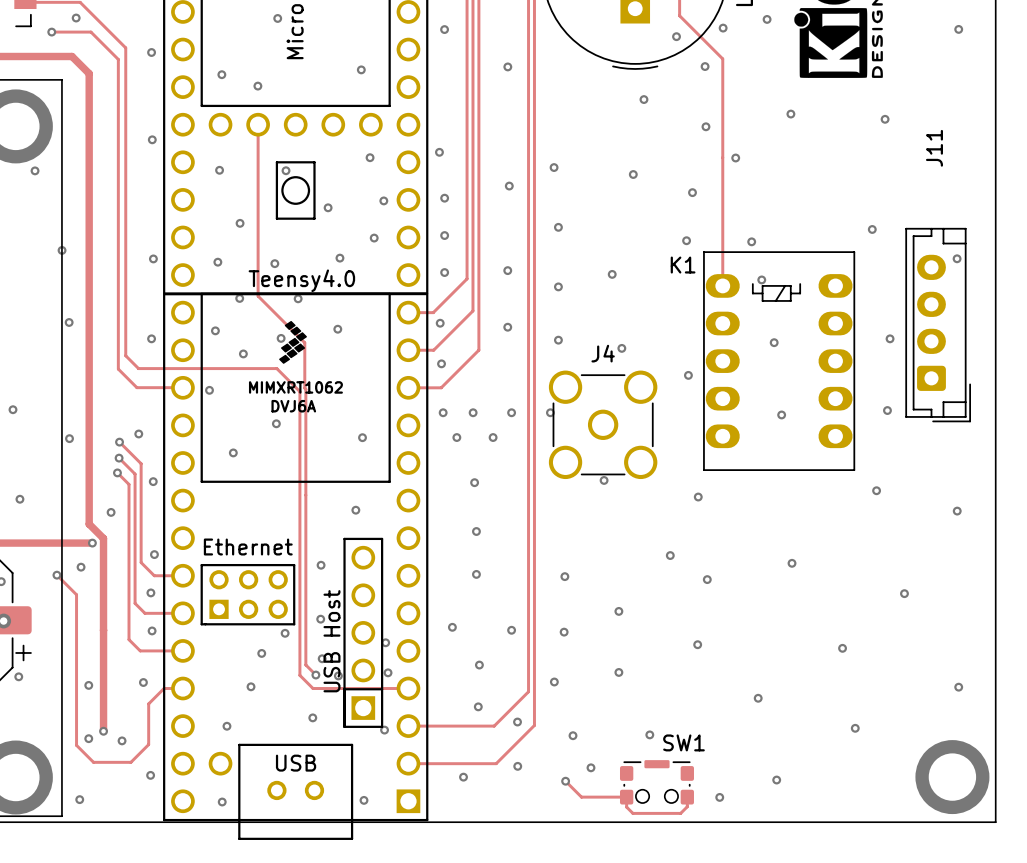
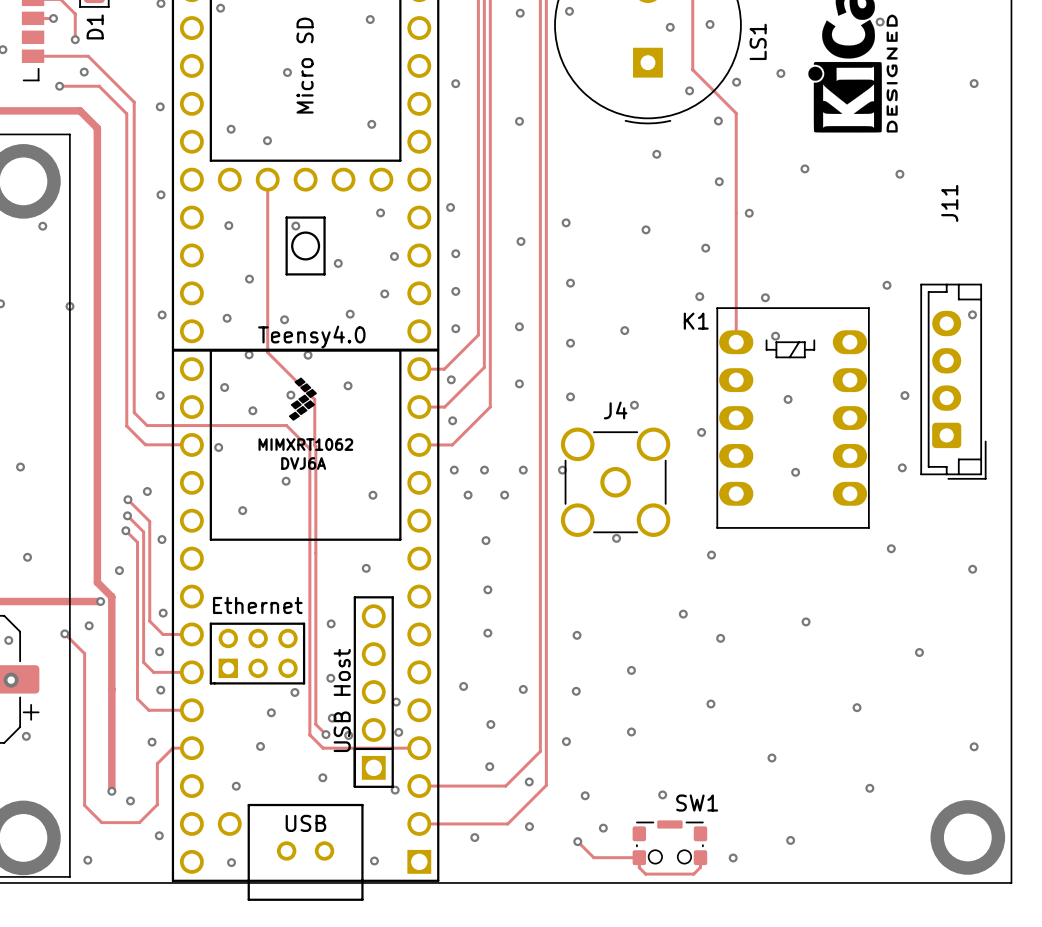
via: (69, 322) -> none
via: (69, 438) -> none
via: (88, 685) -> none
via: (88, 738) -> none

